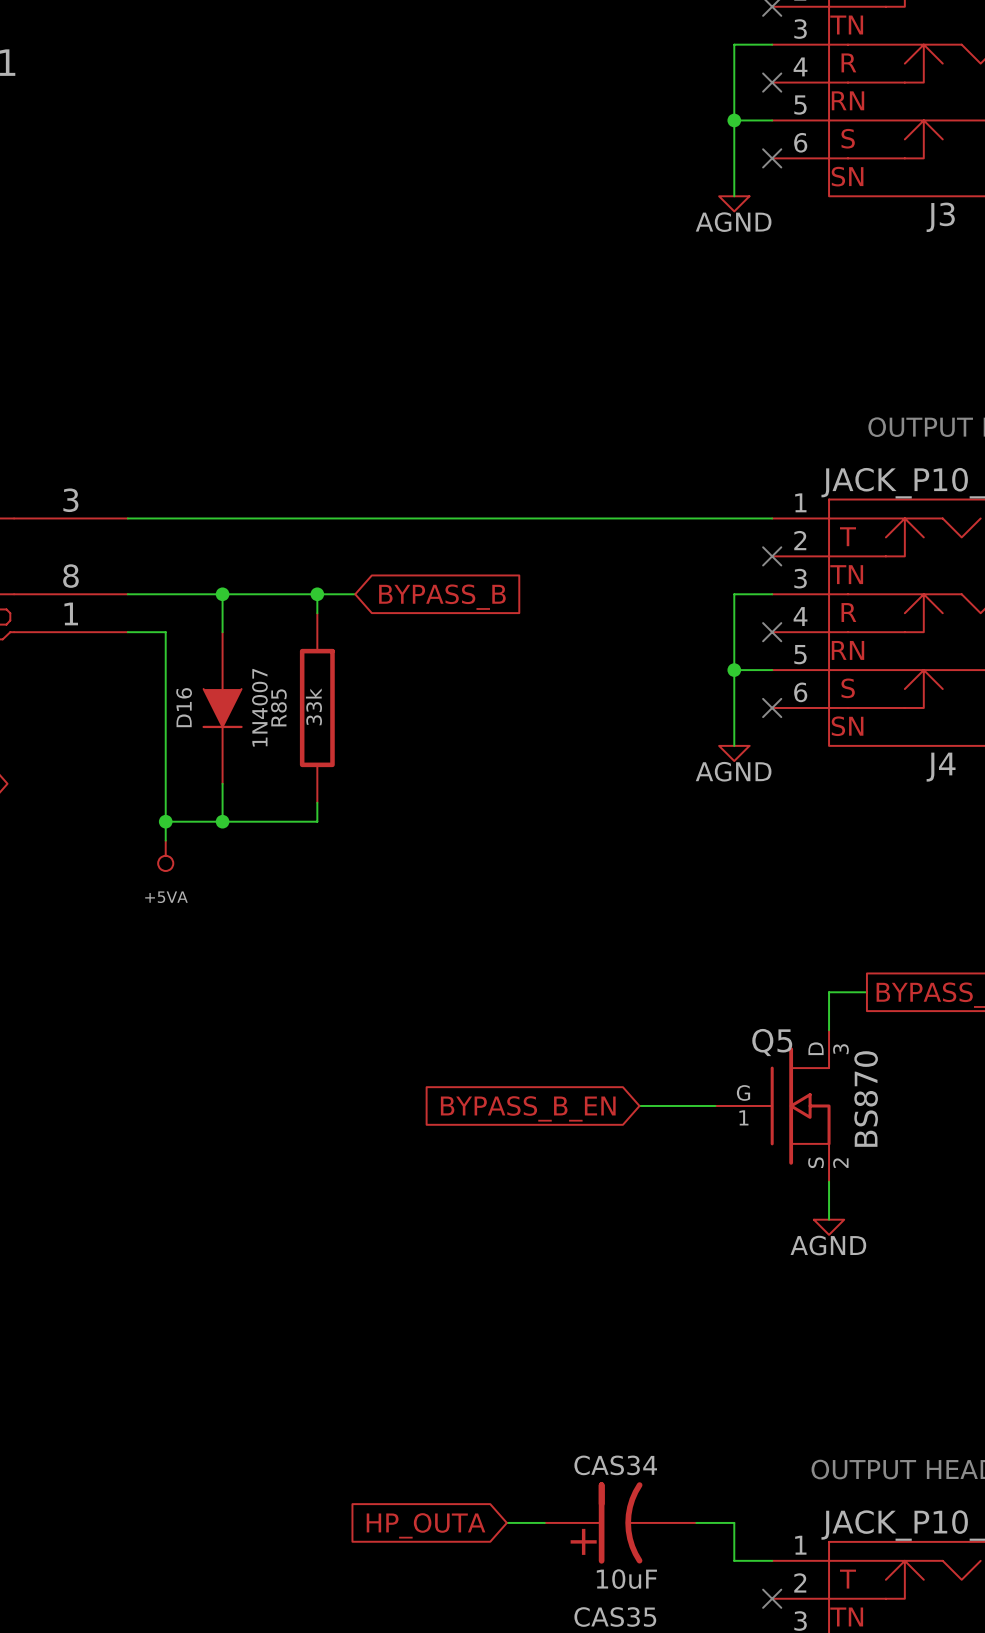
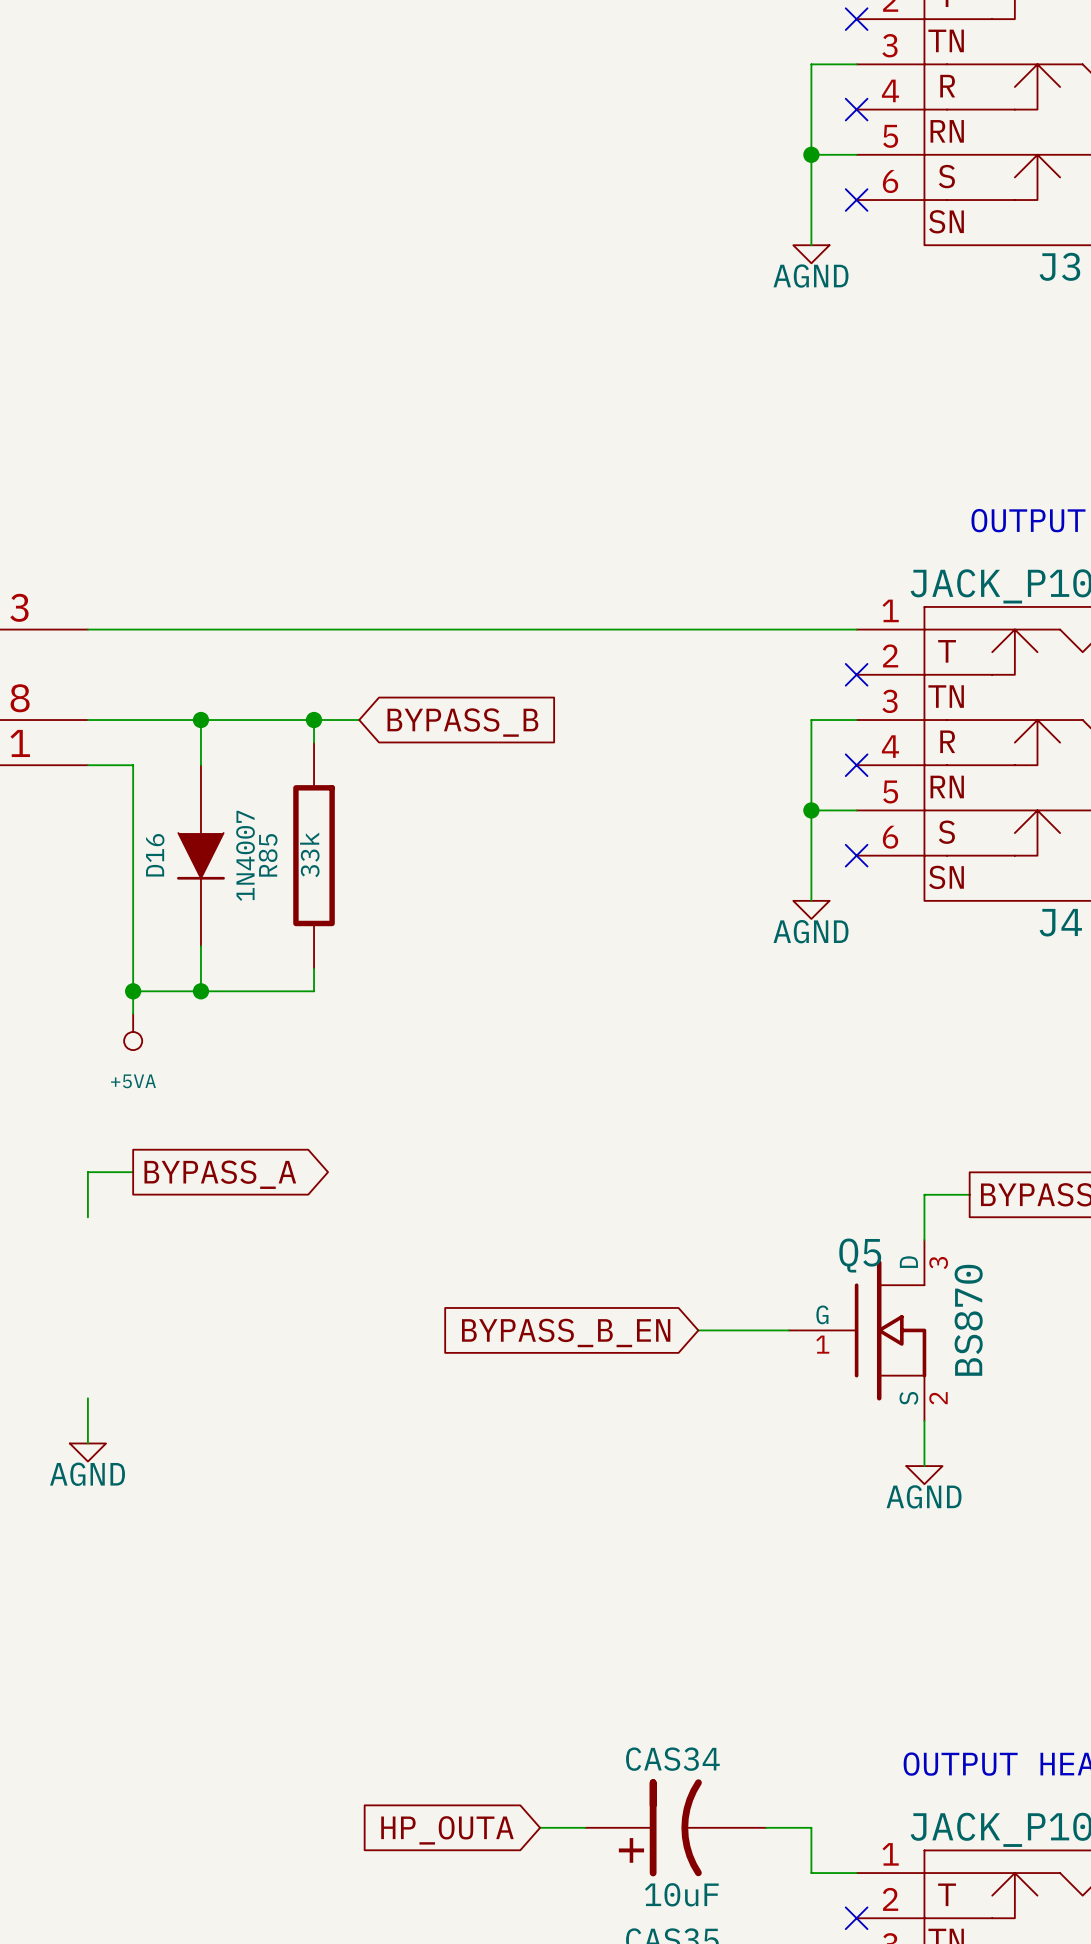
wire: none -> (133, 1172) (87, 1172) (87, 1217)
global label: none -> BYPASS_A (220, 1174)
wire: none -> (87, 1398) (87, 1443)
power symbol: none -> AGND (87, 1452)

